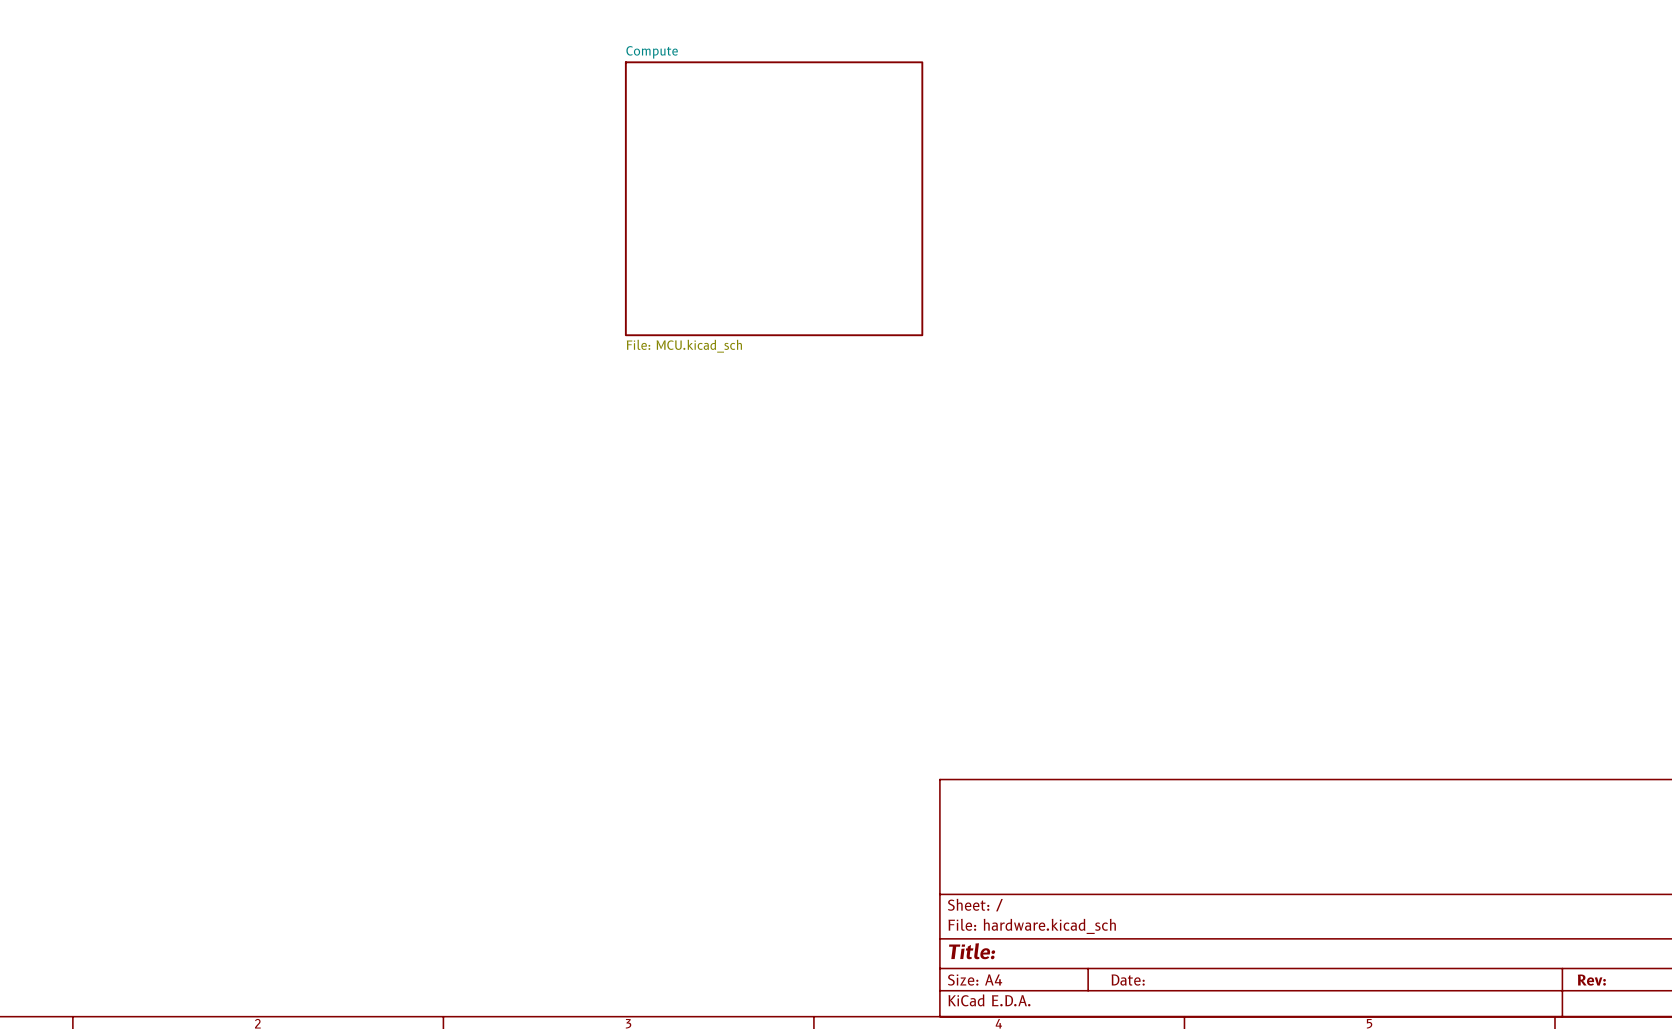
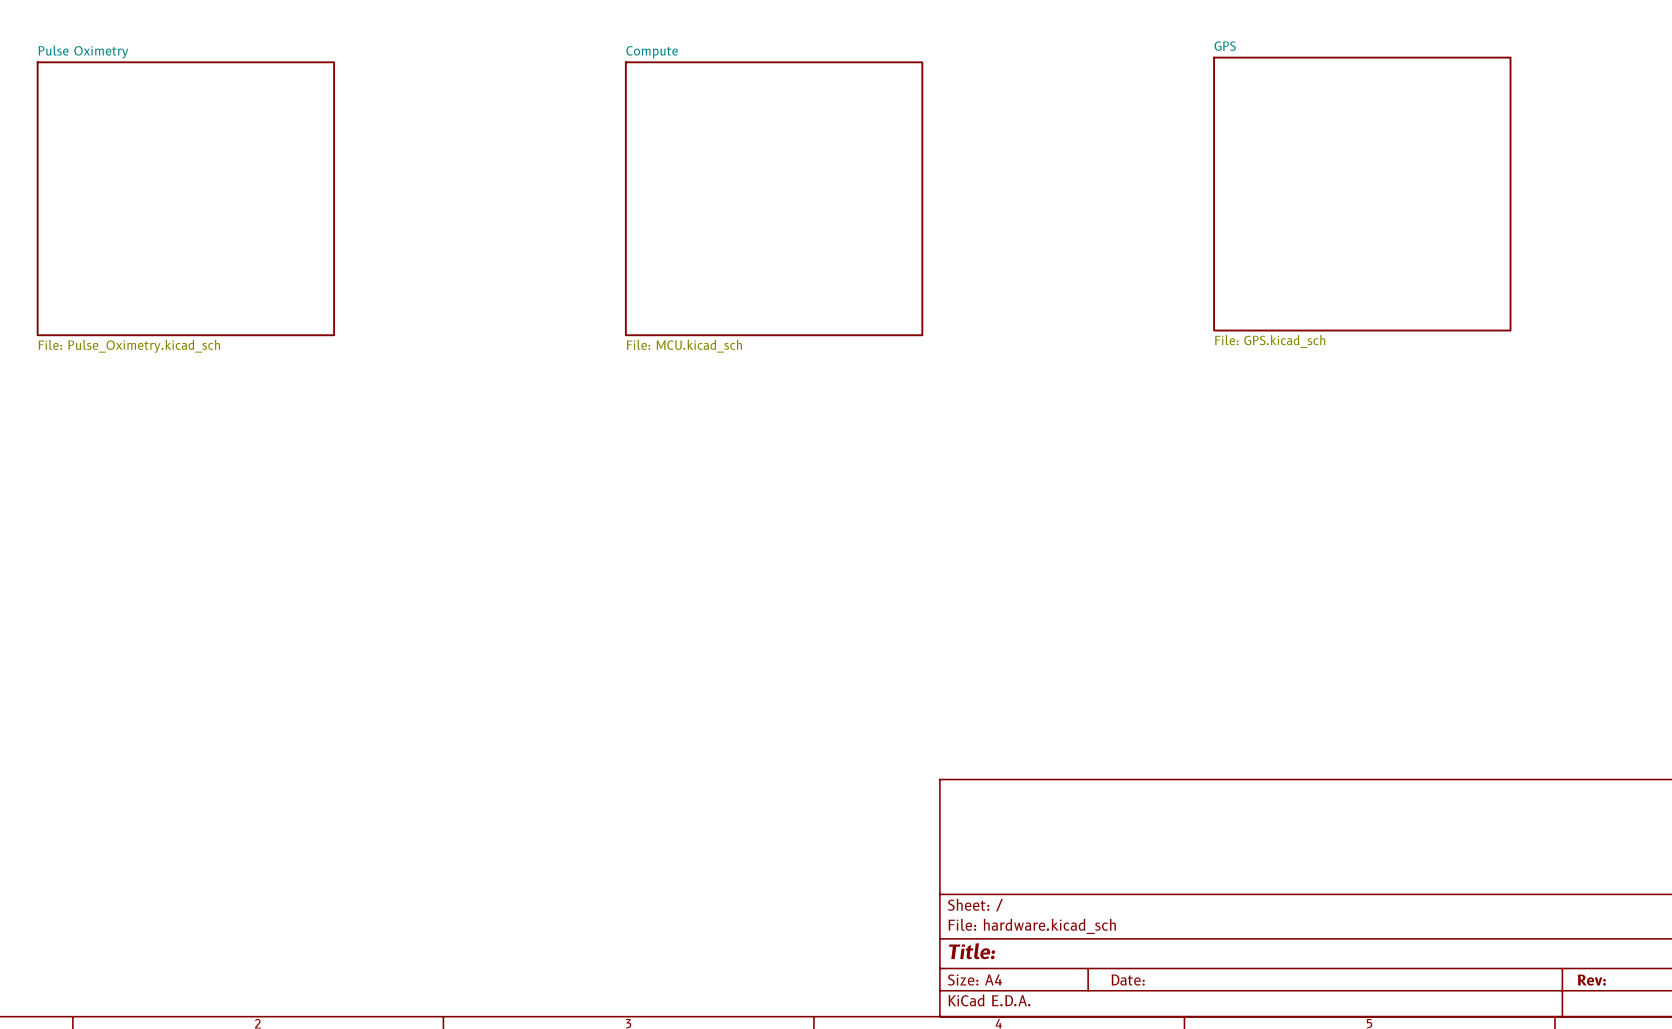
sheet GPS: none -> File: GPS.kicad_sch (1362, 194)
sheet Pulse Oximetry: none -> File: Pulse_Oximetry.kicad_sch (185, 198)

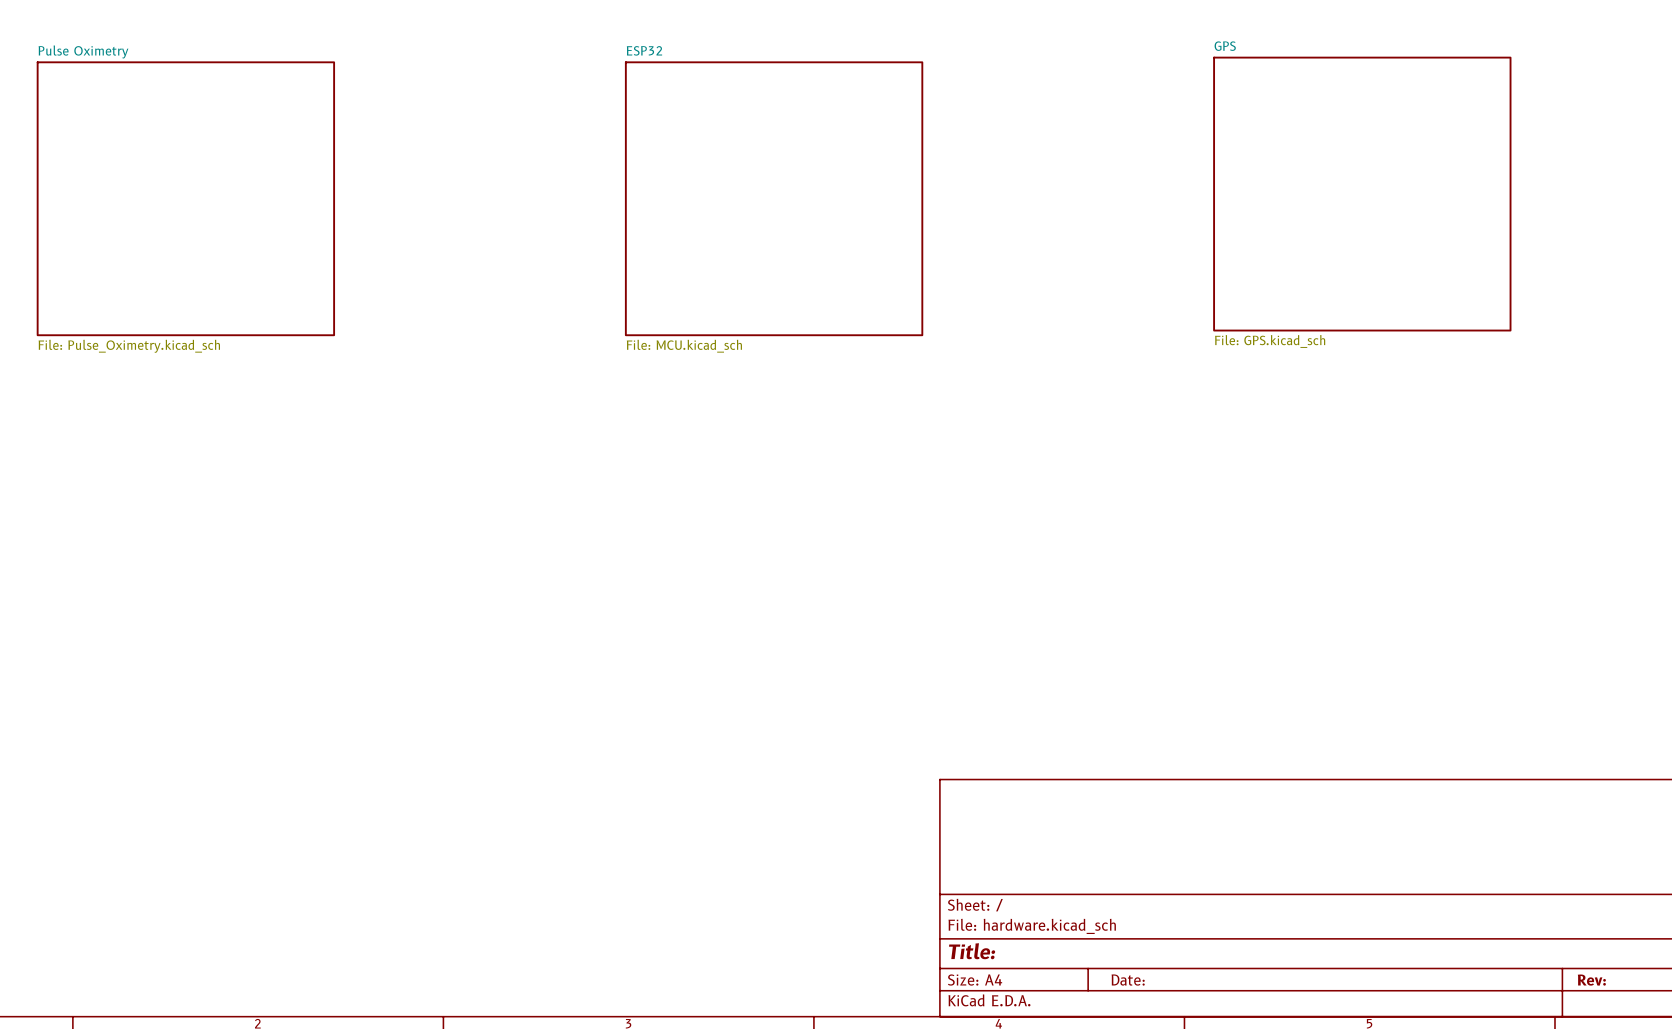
sheet Compute name: Compute (652, 52) -> ESP32 (644, 50)

